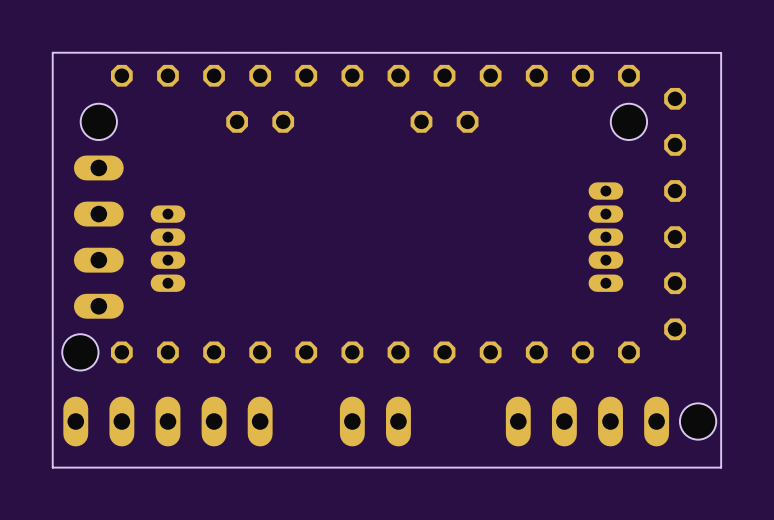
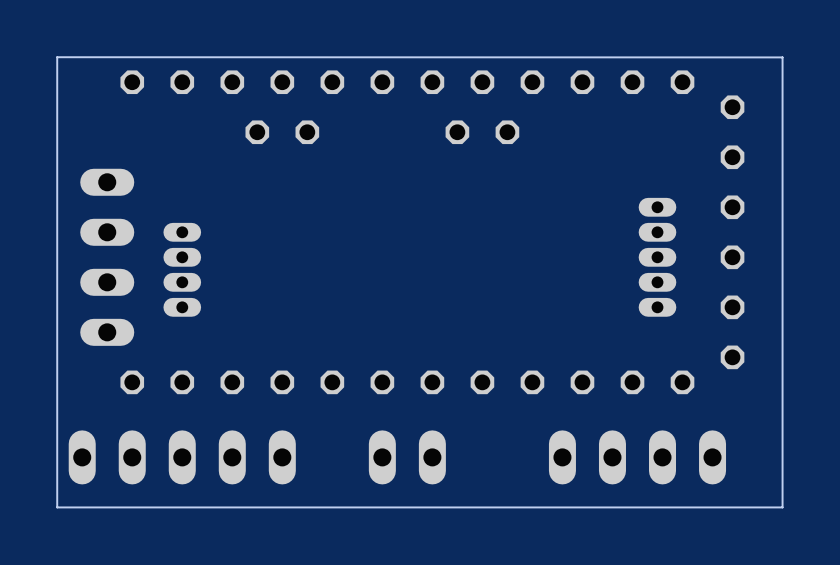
hole: (98, 121) -> none
hole: (628, 121) -> none
hole: (80, 352) -> none
hole: (698, 421) -> none

